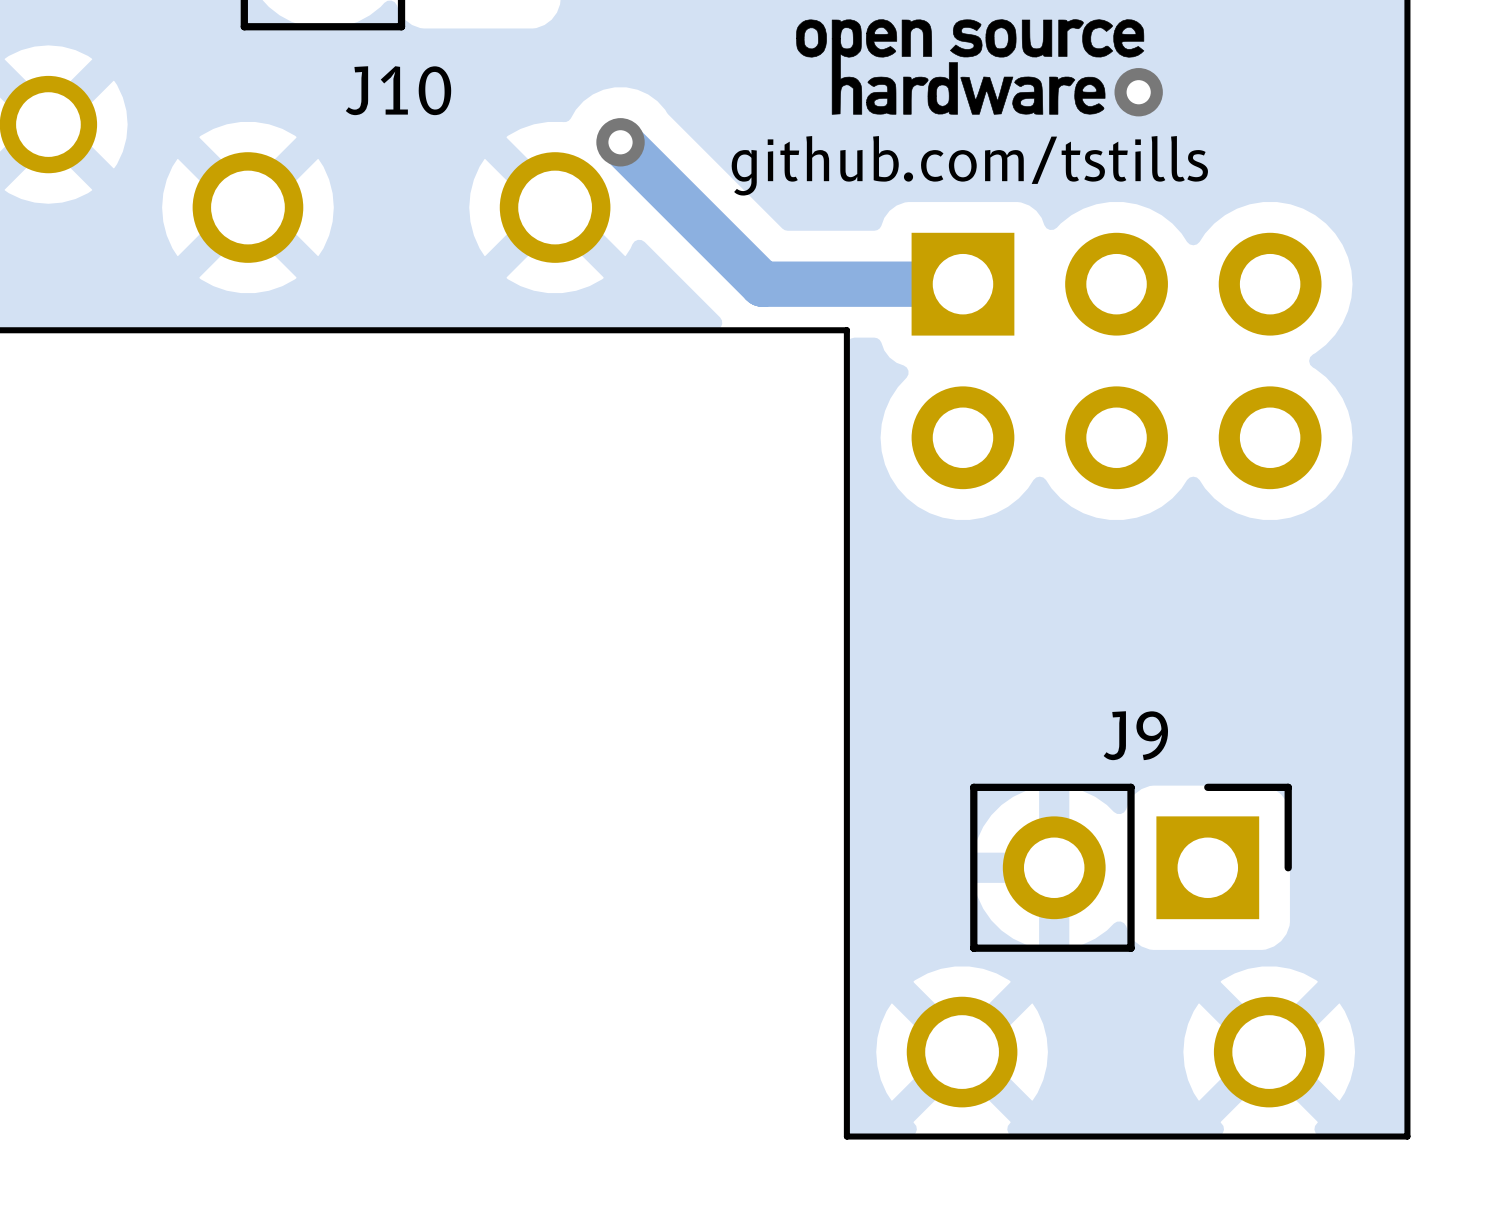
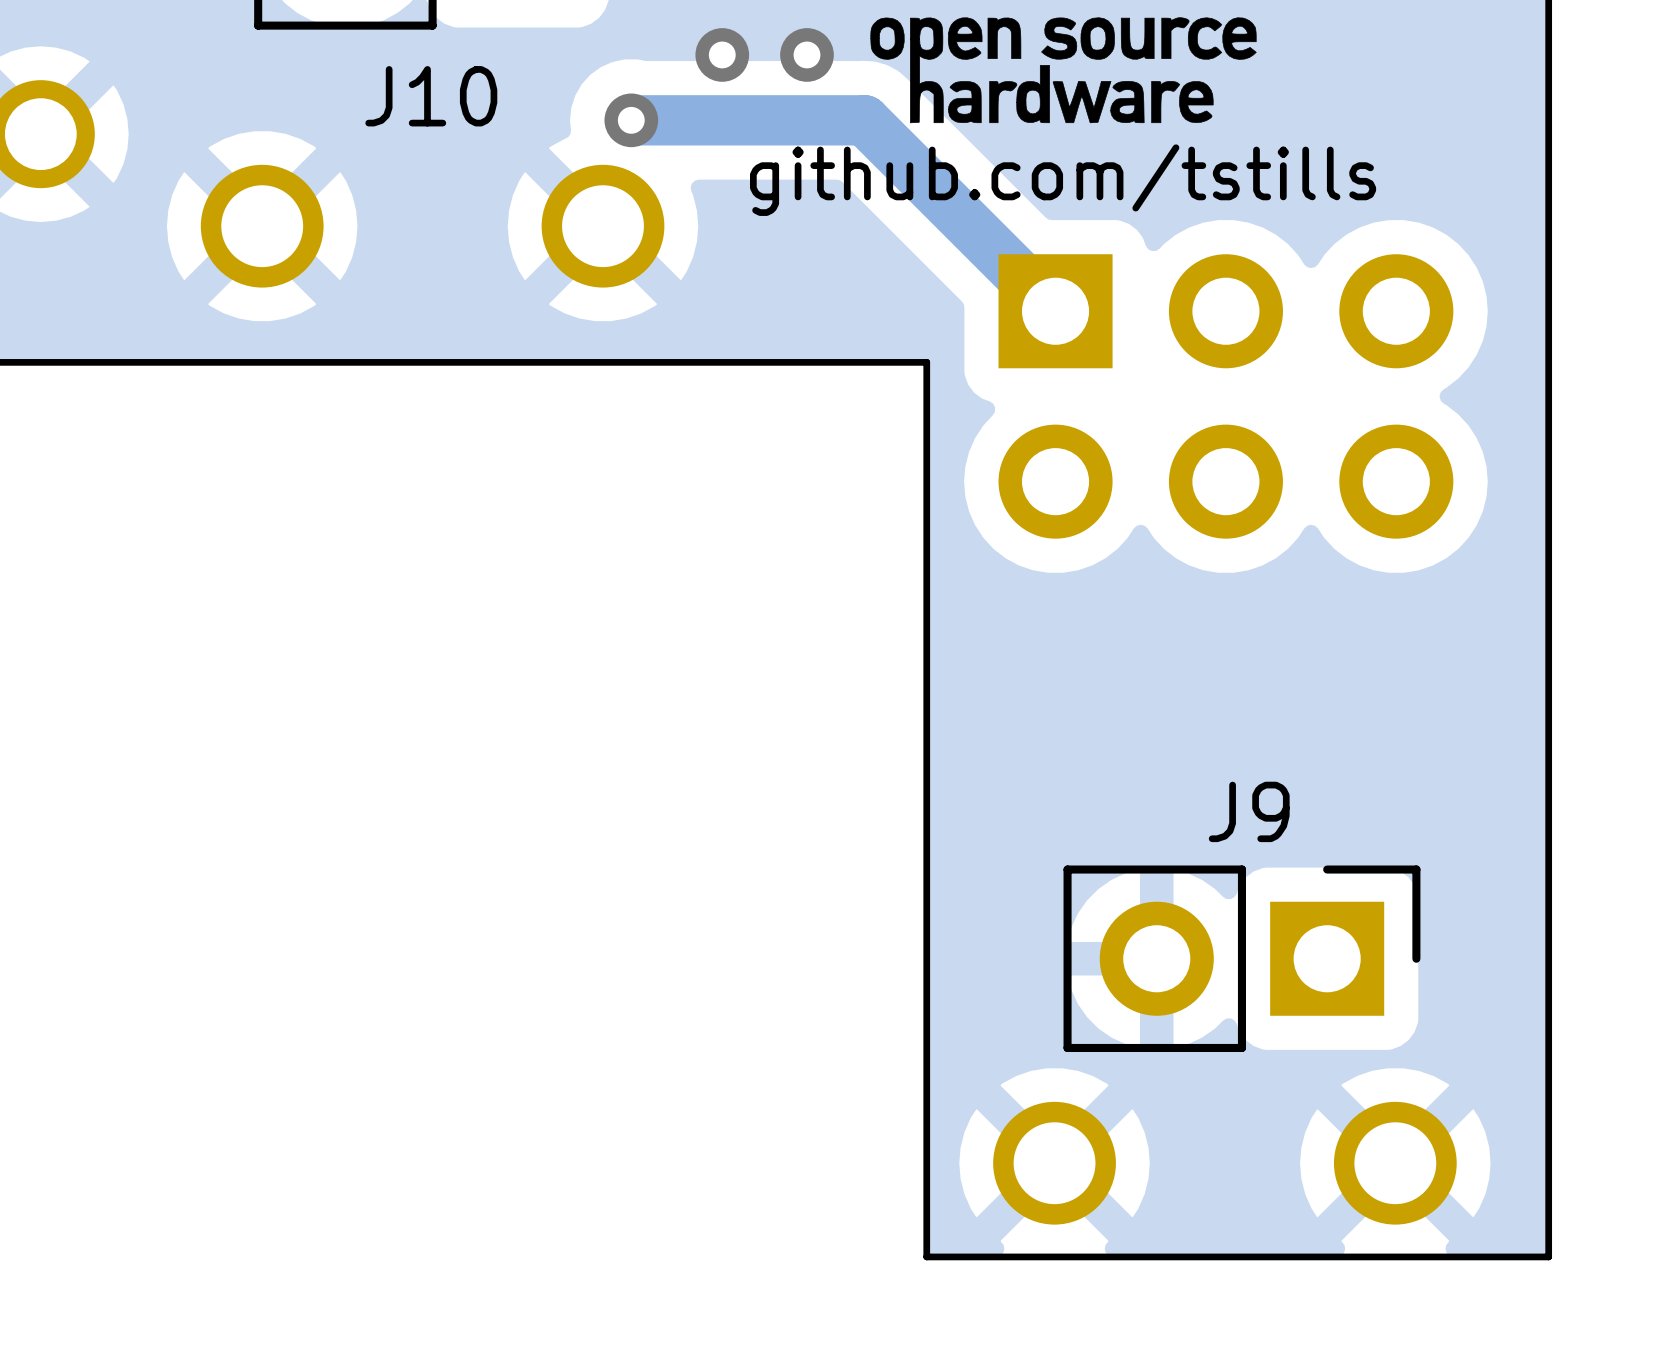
via: none -> (722, 54)
via: none -> (806, 54)
via: (1138, 92) -> none
track: (620, 142) (762, 284) (962, 284) -> (631, 120) (864, 120) (1055, 311)
via position: (620, 142) -> (631, 120)

